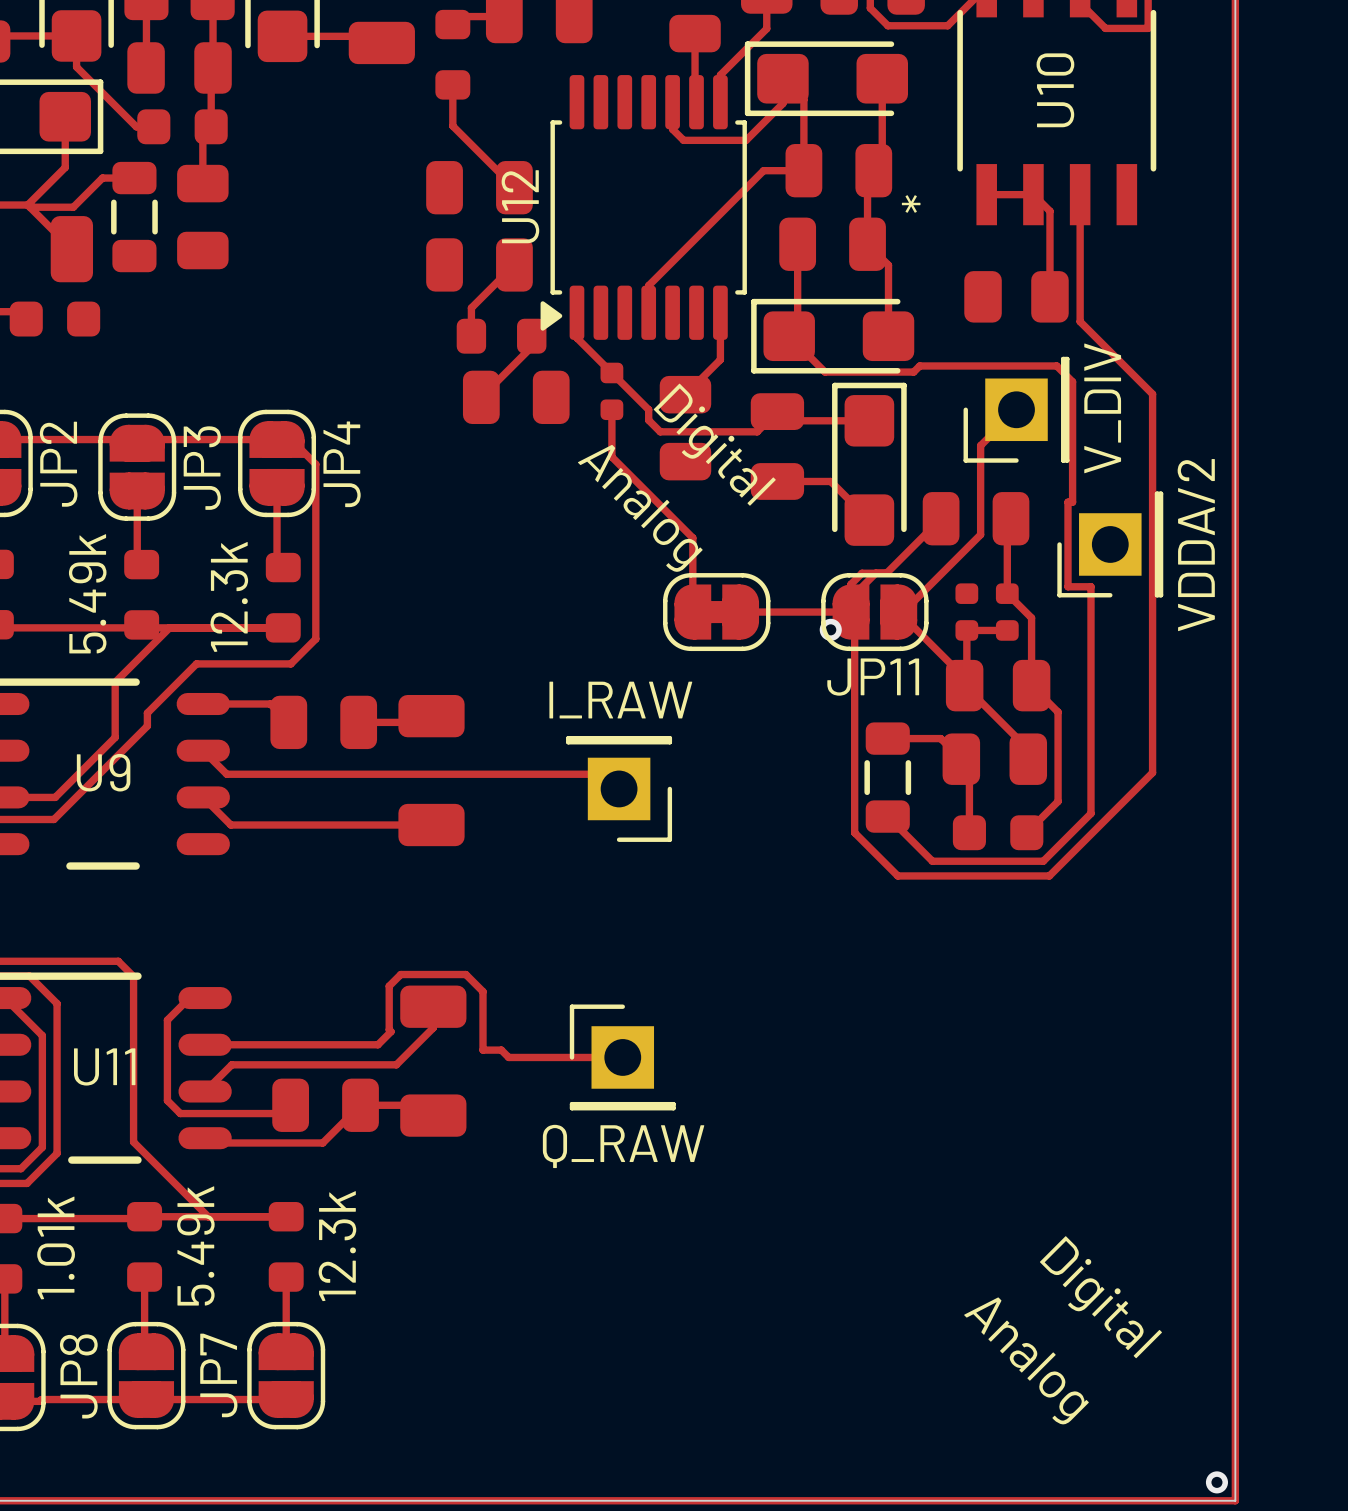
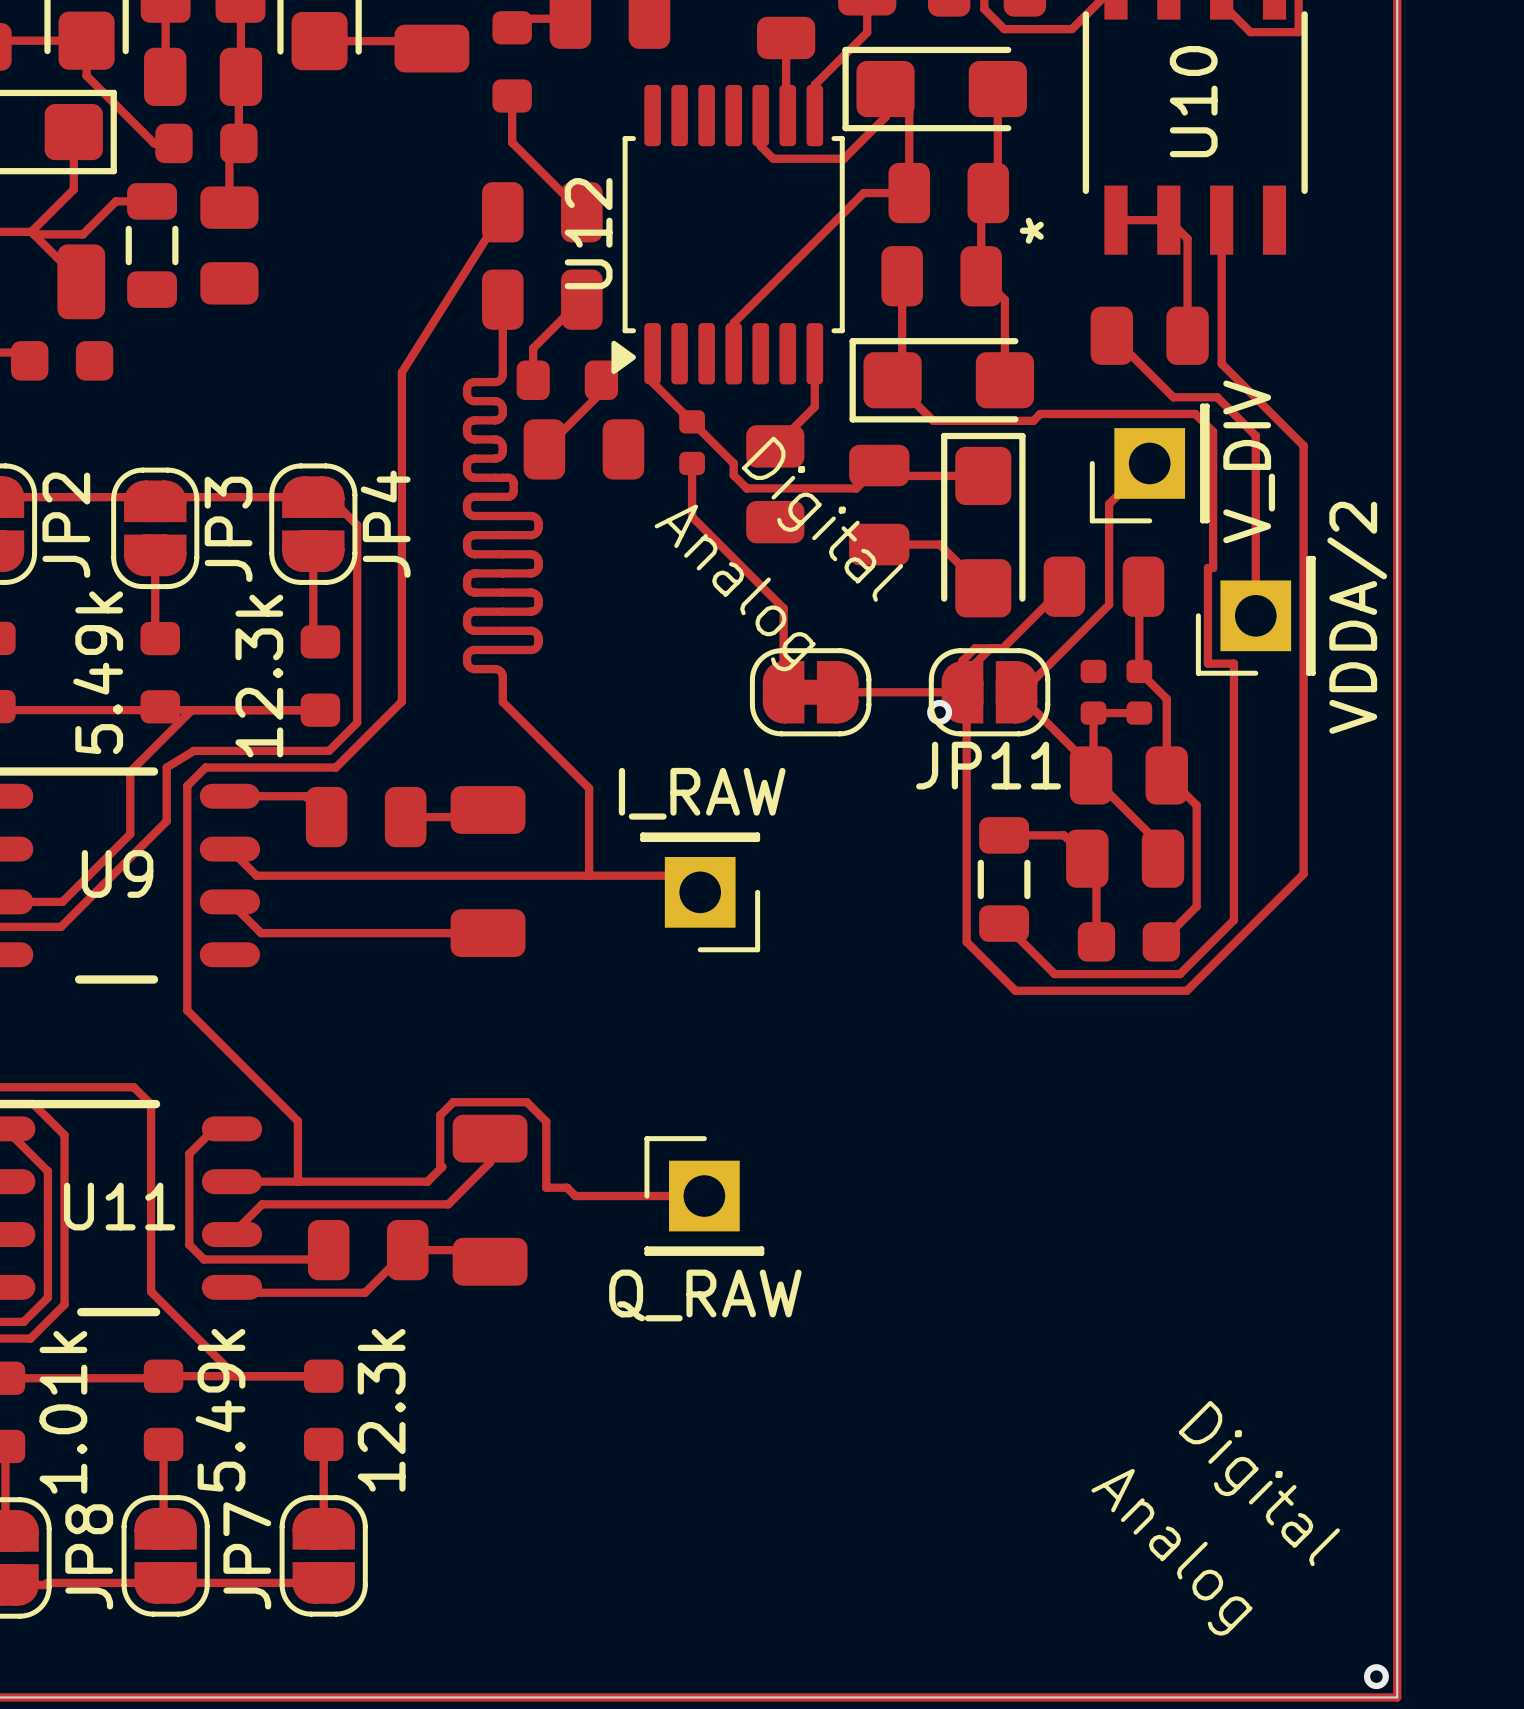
track: none -> (502, 299) (502, 376) (496, 381) (472, 382) (467, 389) (467, 396) (471, 400) (496, 401) (501, 404) (502, 413) (499, 418) (472, 420) (467, 424) (467, 431) (468, 436) (472, 439) (499, 440) (502, 445) (502, 452) (496, 458) (471, 459) (467, 463) (467, 470) (468, 474) (472, 477) (510, 478) (513, 481) (513, 492) (508, 496) (472, 497) (467, 501) (467, 509) (469, 513) (473, 515) (532, 516) (537, 520) (538, 528) (536, 532) (531, 535) (472, 535) (467, 539) (467, 547) (469, 552) (473, 554) (532, 554) (537, 558) (538, 566) (536, 571) (531, 573) (472, 573) (467, 577) (467, 585) (469, 590) (473, 592) (532, 592) (537, 596) (538, 604) (536, 609) (531, 611) (472, 611) (467, 616) (467, 624) (469, 628) (473, 630) (532, 631) (537, 635) (538, 643) (536, 647) (531, 649) (472, 650) (467, 654) (467, 662) (472, 668) (496, 669) (500, 671) (502, 675) (502, 702) (589, 788) (589, 875)
track: none -> (1111, 335) (1173, 397) (1217, 397) (1255, 435) (1255, 615)
track: (196, 663) (181, 678) -> (502, 212) (401, 372) (401, 701) (335, 767) (205, 767)
track: (165, 694) (147, 713) -> (222, 750) (193, 750) (166, 767) (166, 806)
track: none -> (187, 785) (187, 1010) (297, 1121) (297, 1181)

